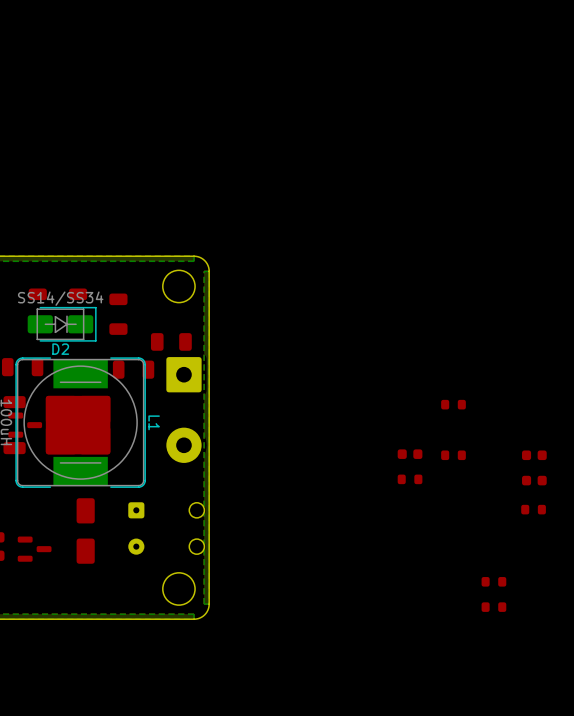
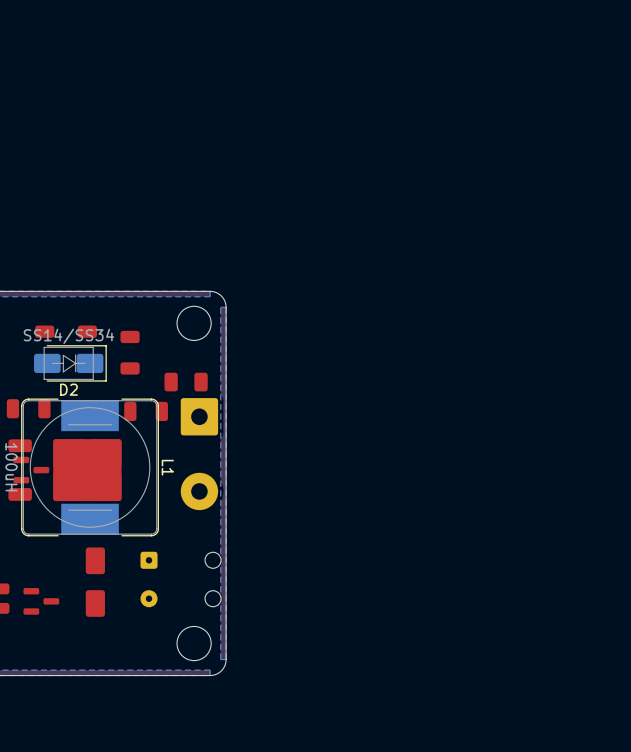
part: (453, 404) -> none
part: (410, 454) -> none
part: (453, 455) -> none
part: (534, 455) -> none
part: (410, 479) -> none
part: (534, 480) -> none
part: (533, 509) -> none
part: (493, 581) -> none
part: (493, 607) -> none

